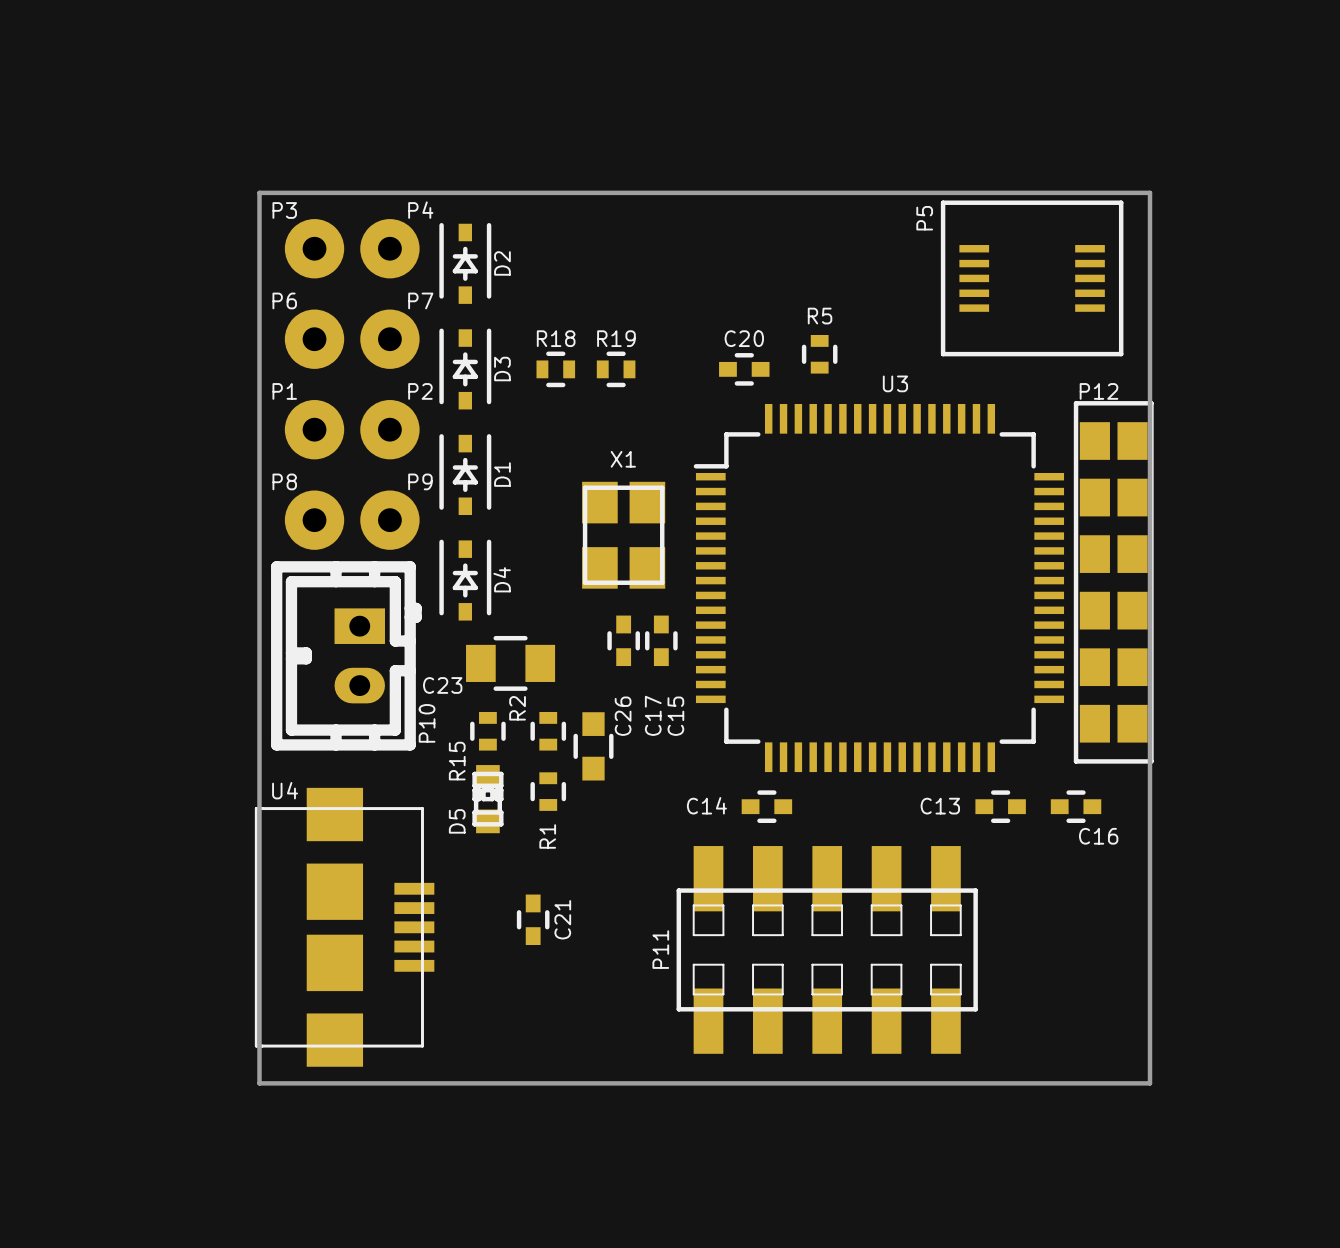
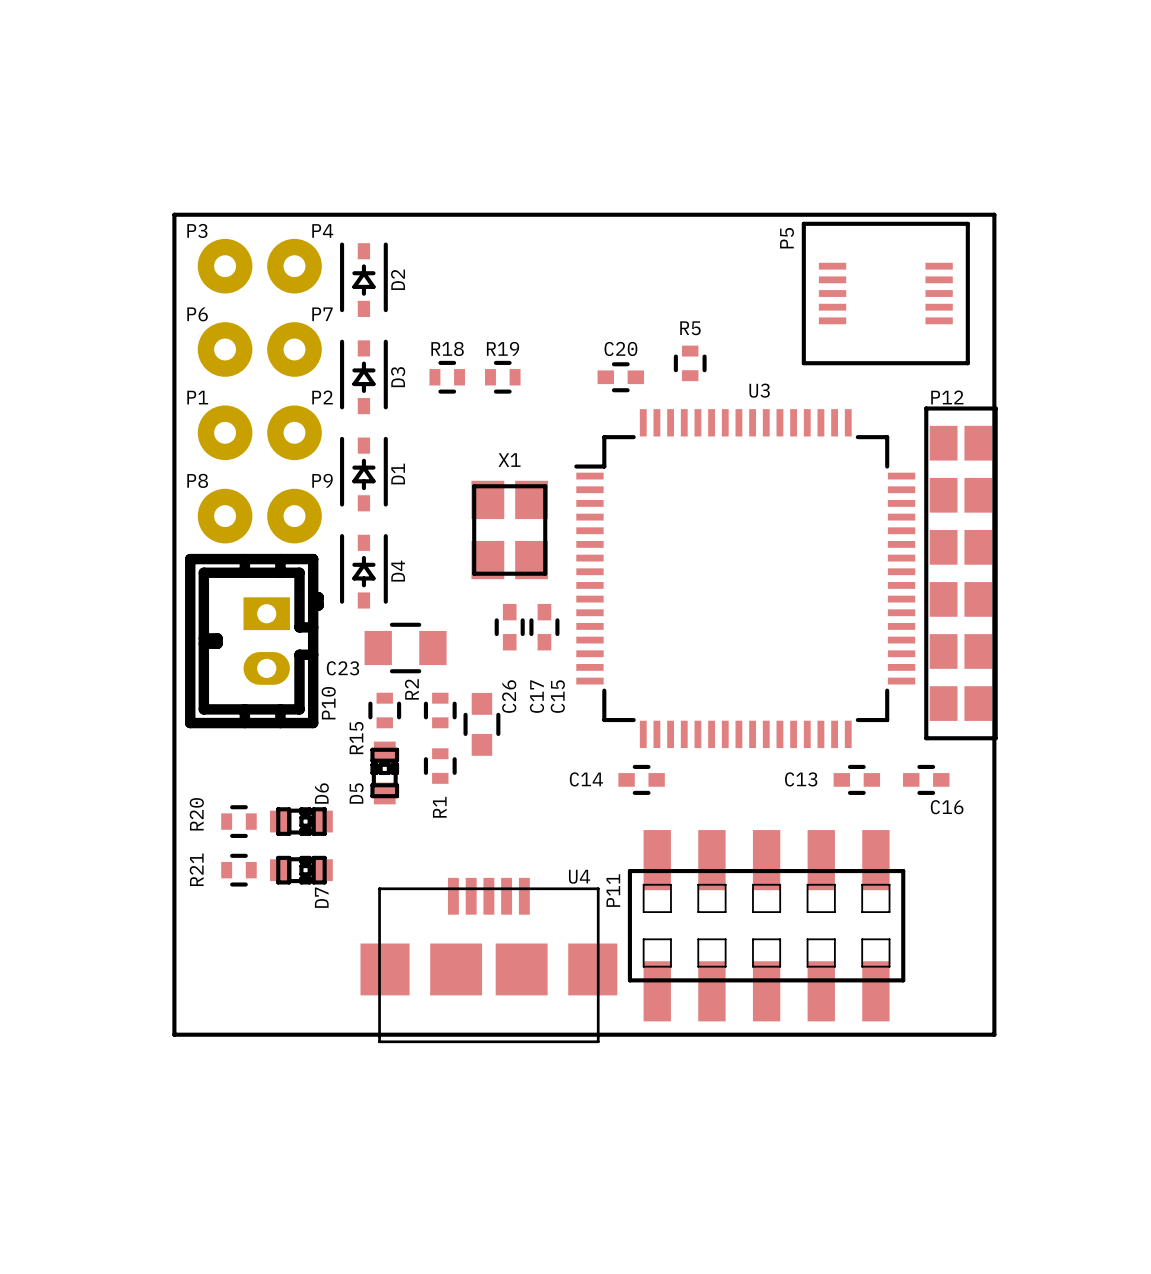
U4 name position: U4 (285, 790) -> U4 (579, 876)
R20: none -> (238, 821)
D6: none -> (301, 821)
R21: none -> (238, 870)
D7: none -> (301, 870)
C21: (533, 919) -> none
U4 rotation: 0° (344, 927) -> 90° counterclockwise (488, 960)
U4 position: (344, 927) -> (488, 960)
P11 name position: P11 (660, 949) -> P11 (613, 890)
P11 position: (827, 949) -> (766, 925)

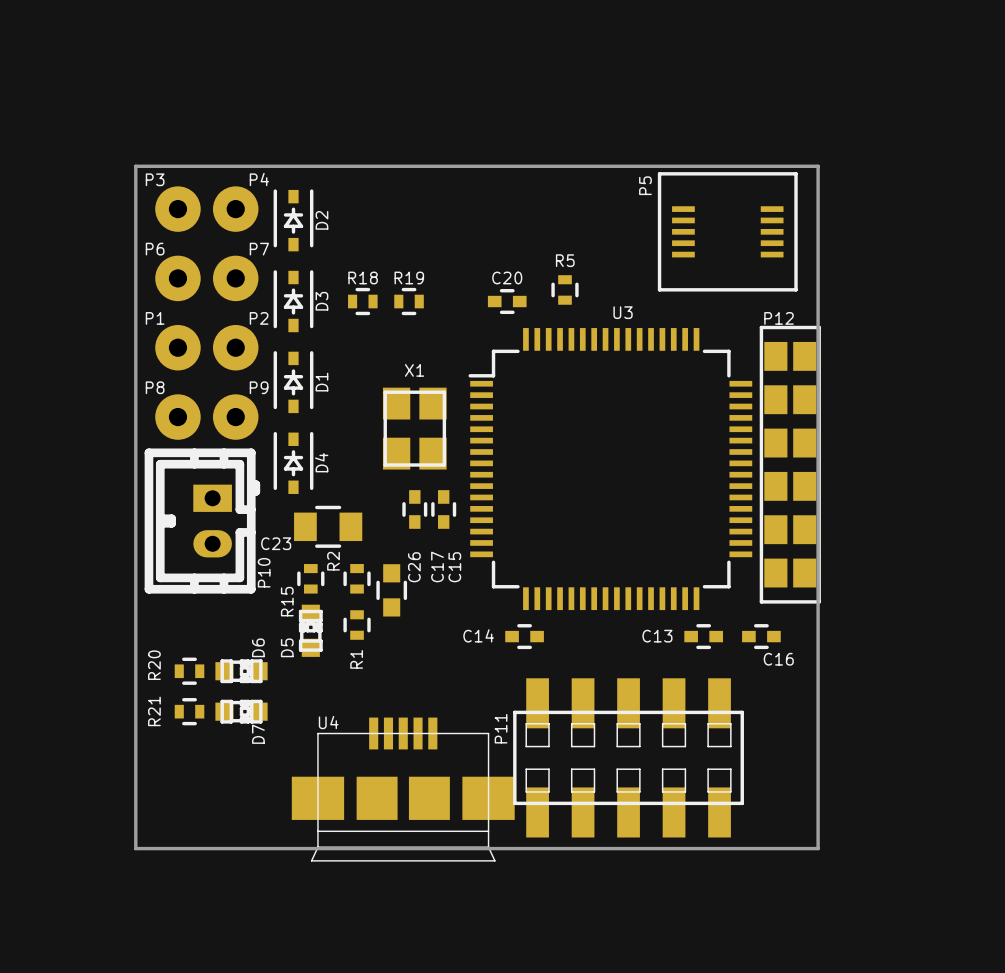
U4 name position: U4 (579, 876) -> U4 (328, 722)
U4 footprint: [360, 877, 618, 1044] -> [291, 717, 515, 862]

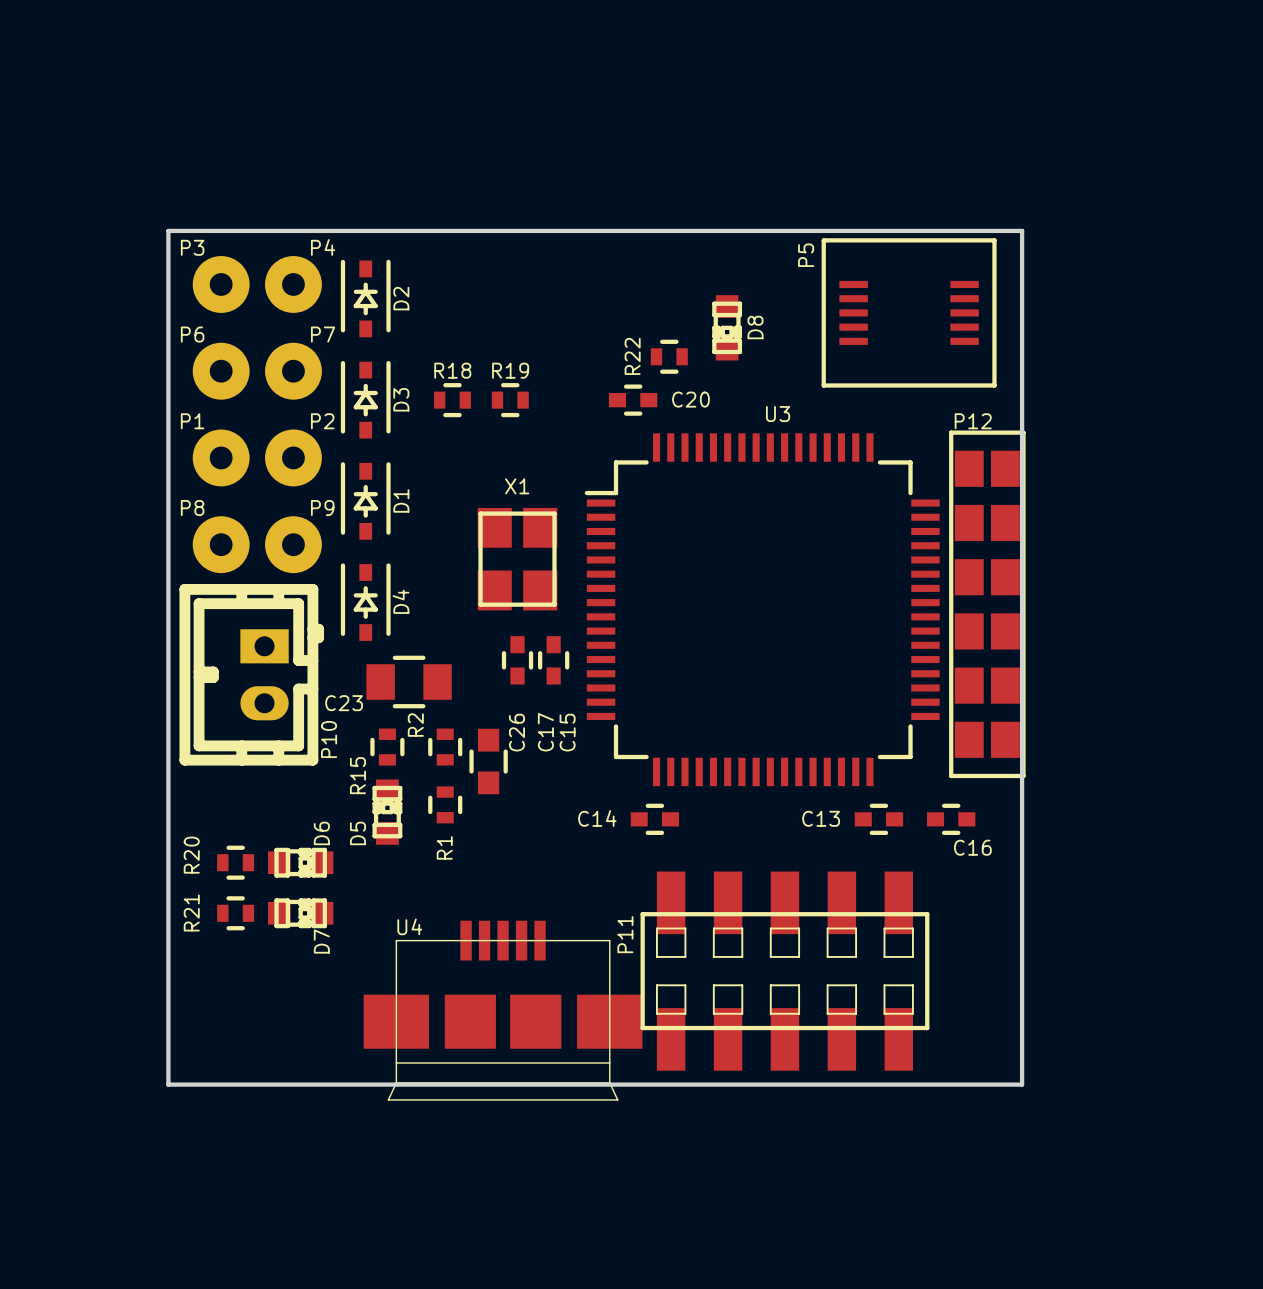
D8: none -> (727, 327)
R22: none -> (669, 356)
C20 name position: C20 (507, 277) -> C20 (690, 399)
R5: (565, 289) -> none

